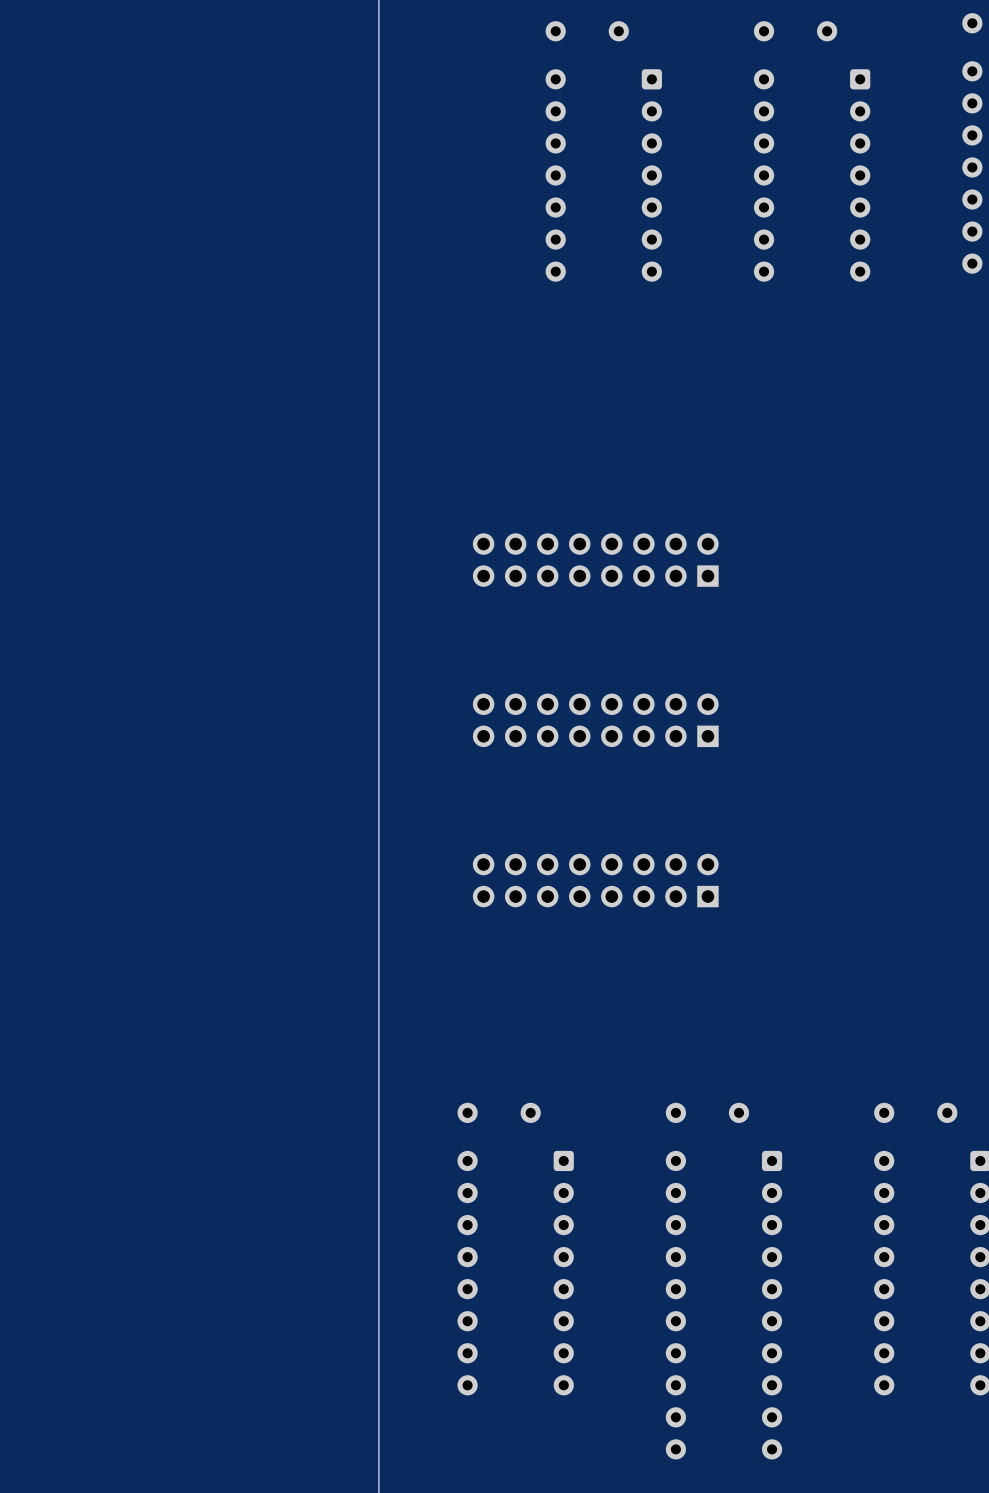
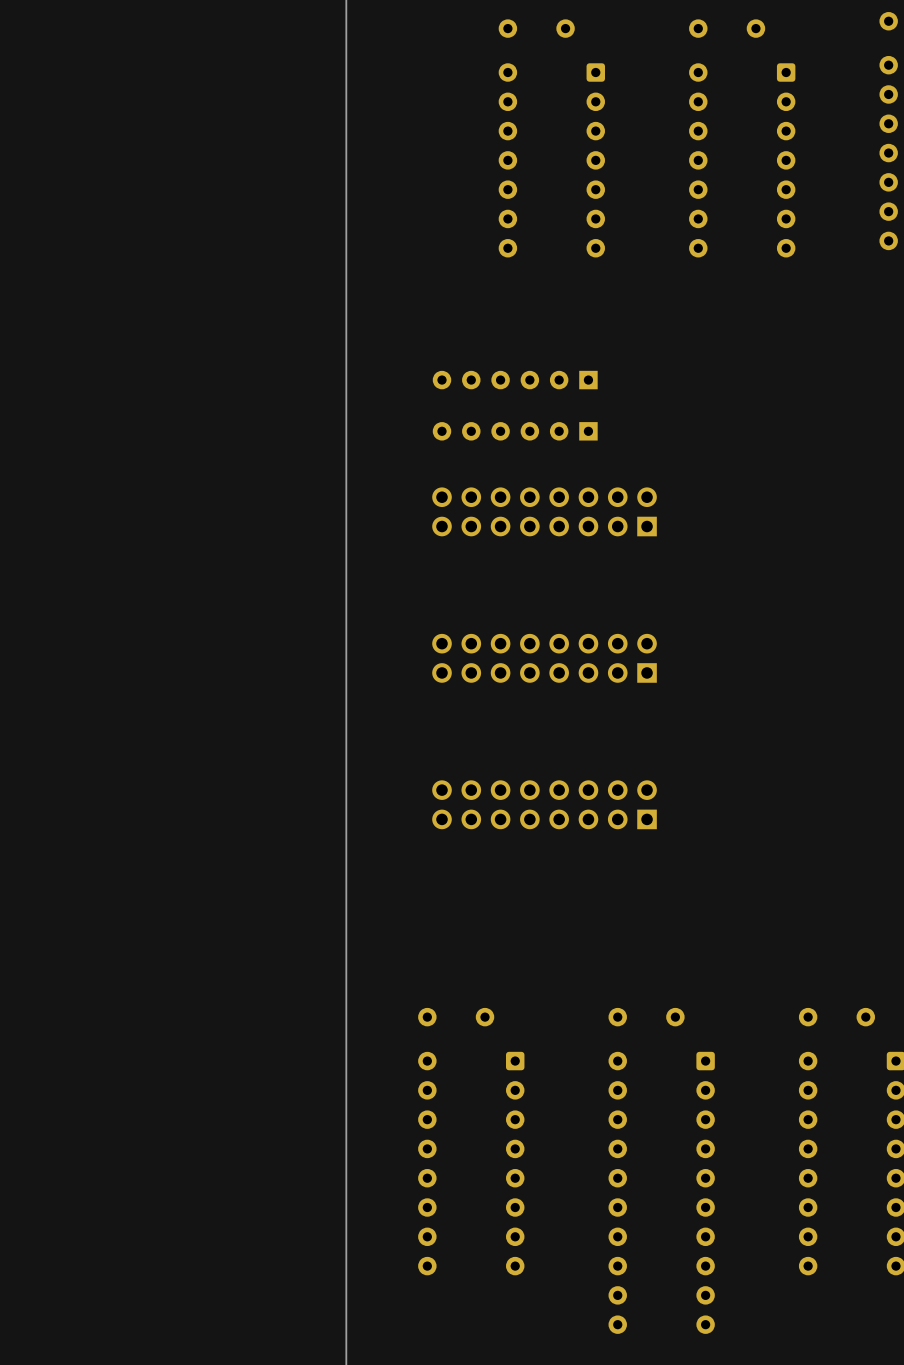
part: none -> (515, 380)
part: none -> (515, 431)

